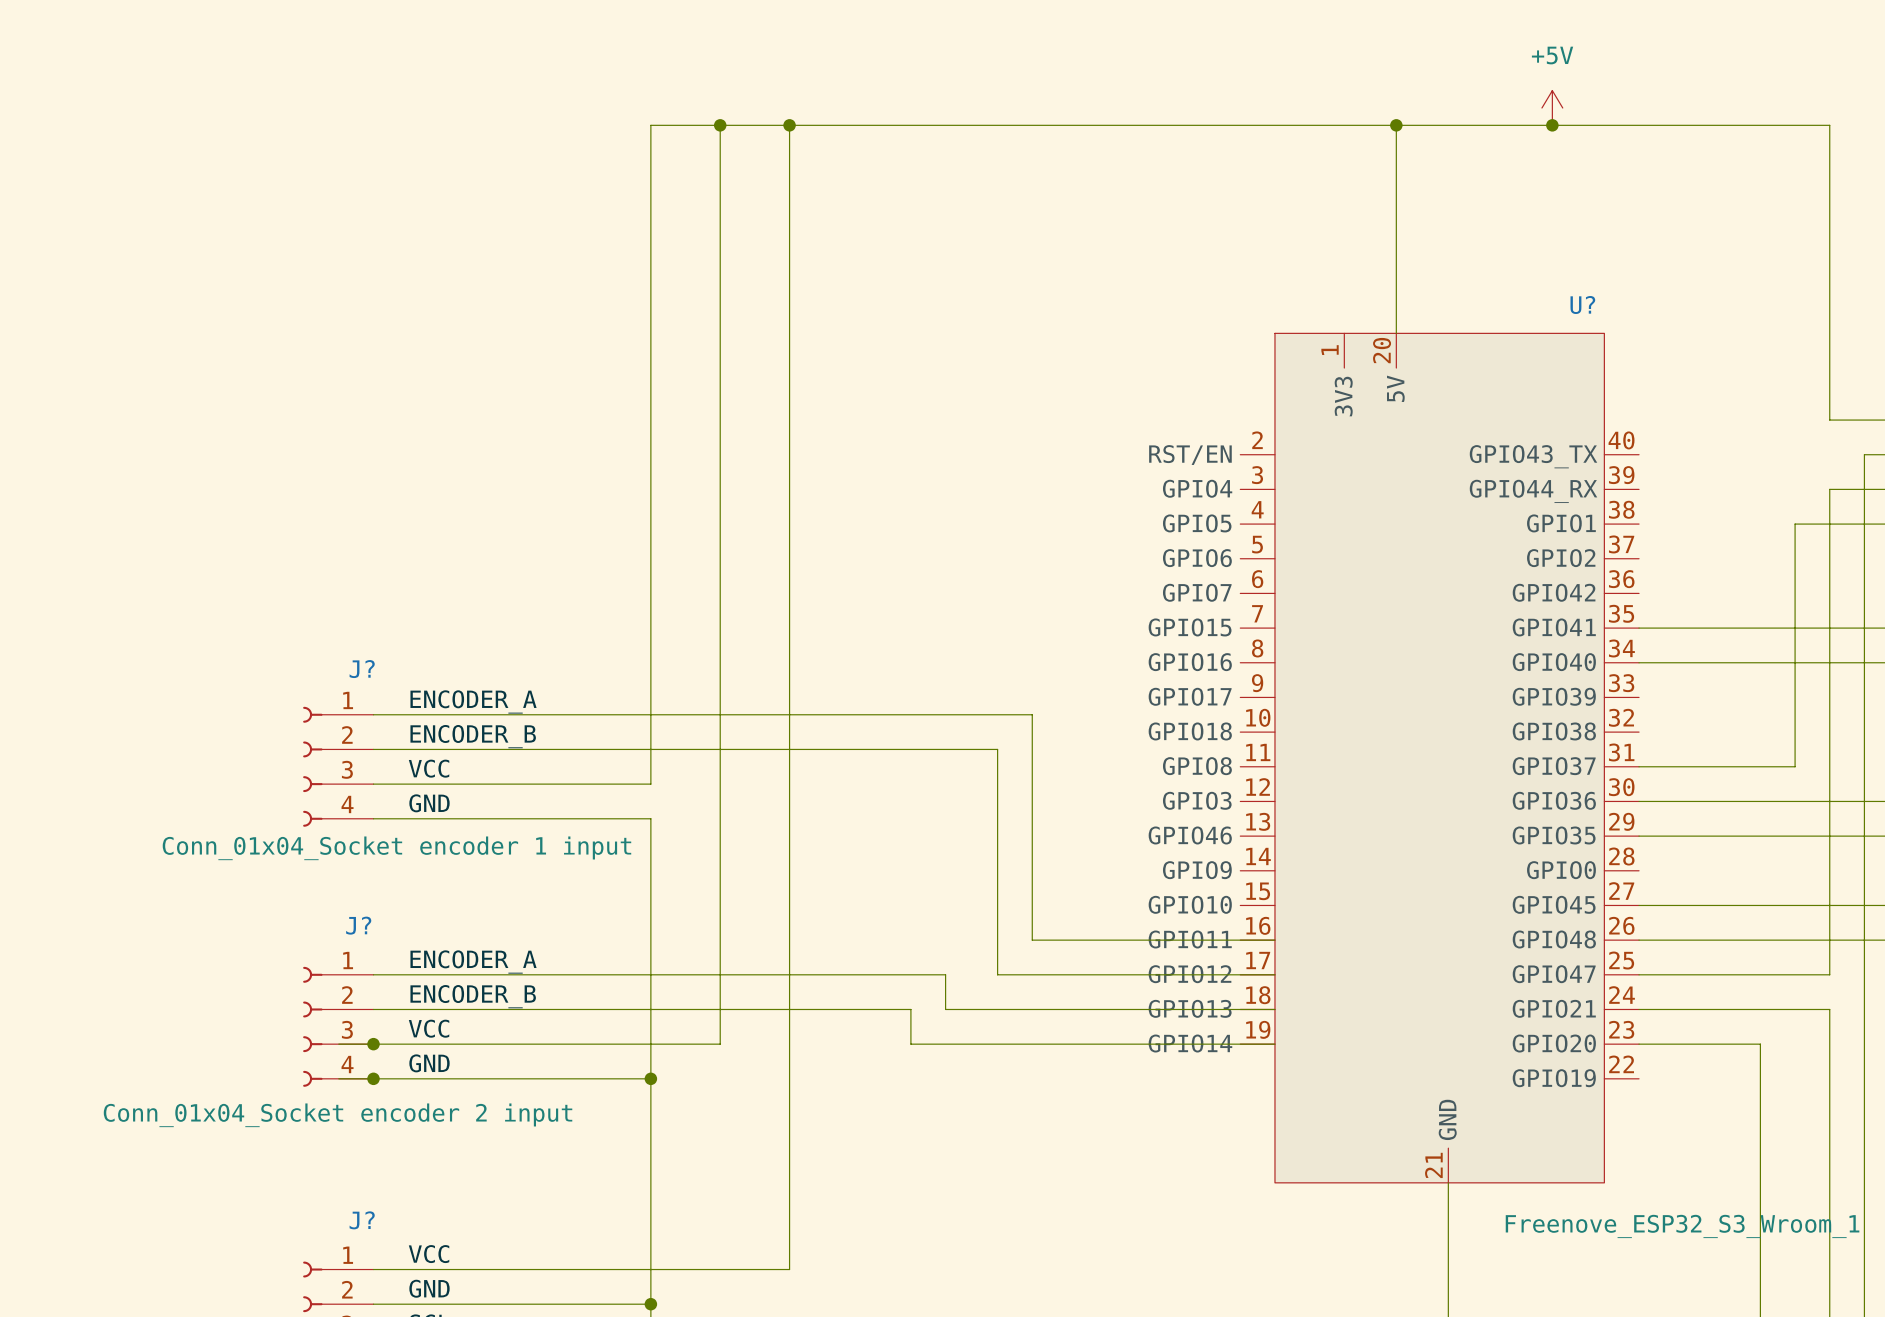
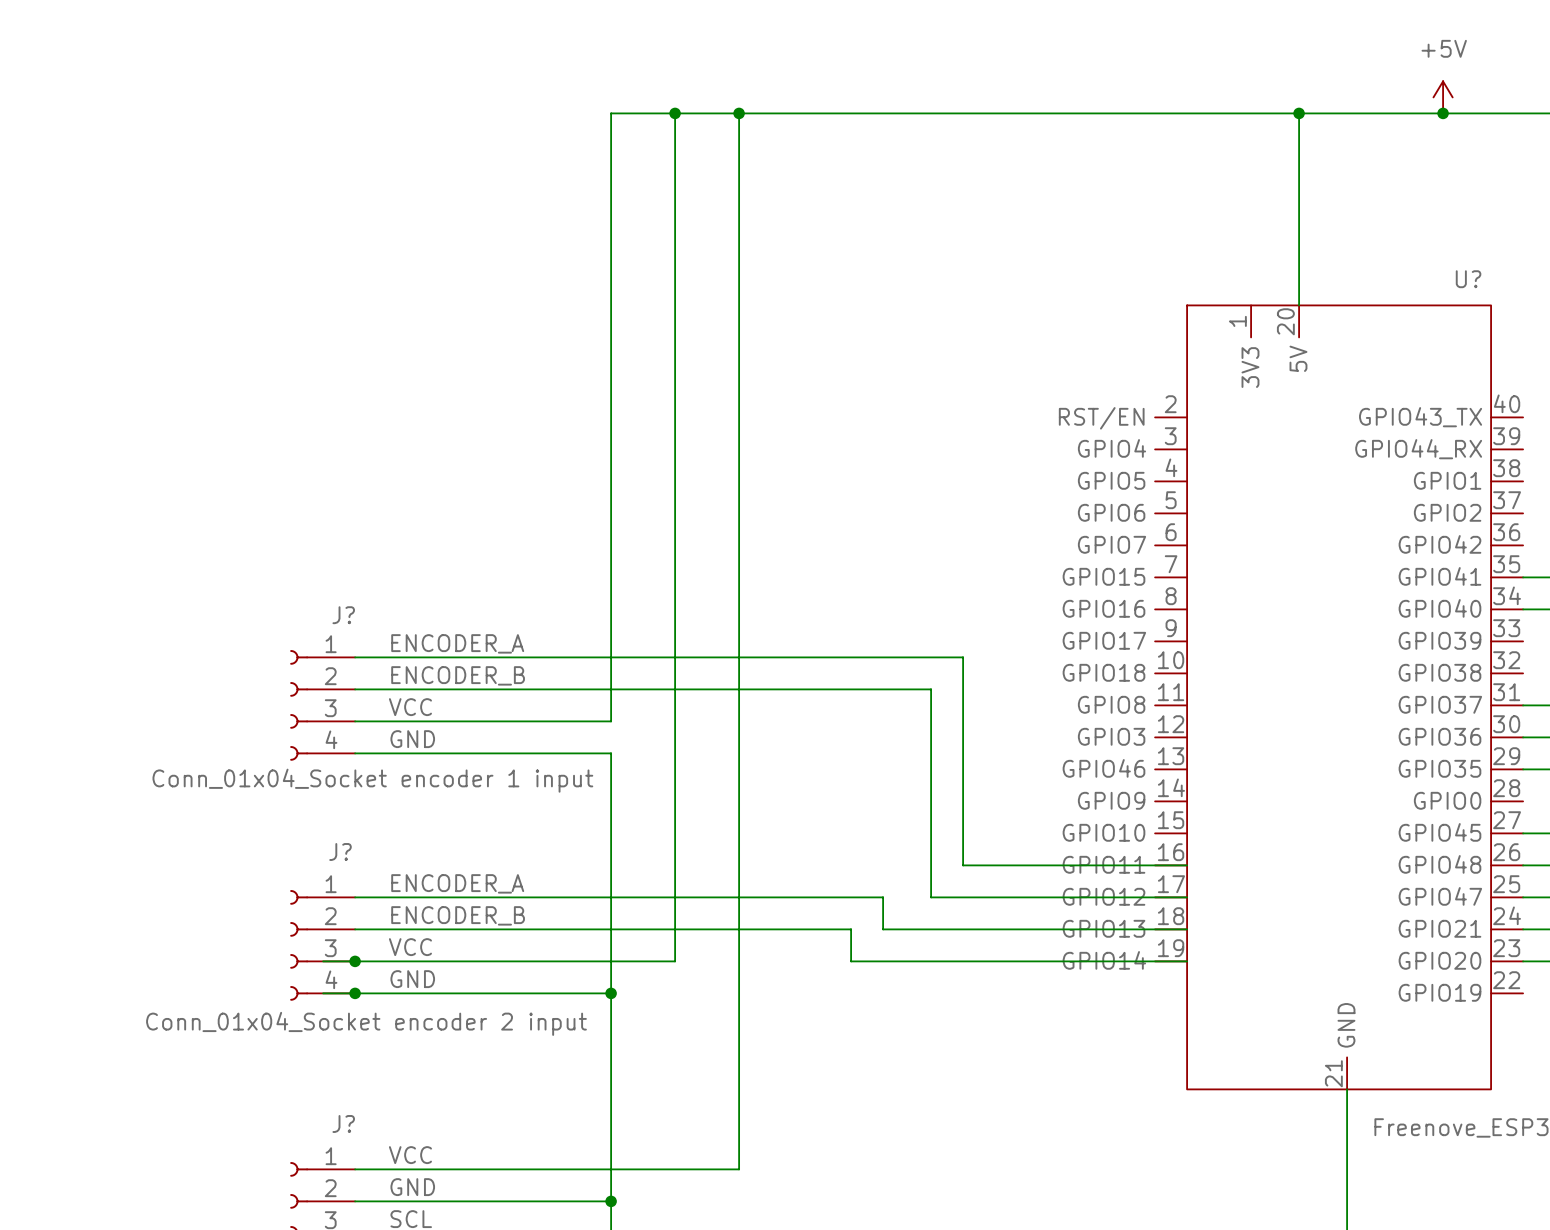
J? value position: Conn_01x04_Socket encoder 2 input (338, 1115) -> Conn_01x04_Socket encoder 2 input (366, 1023)

